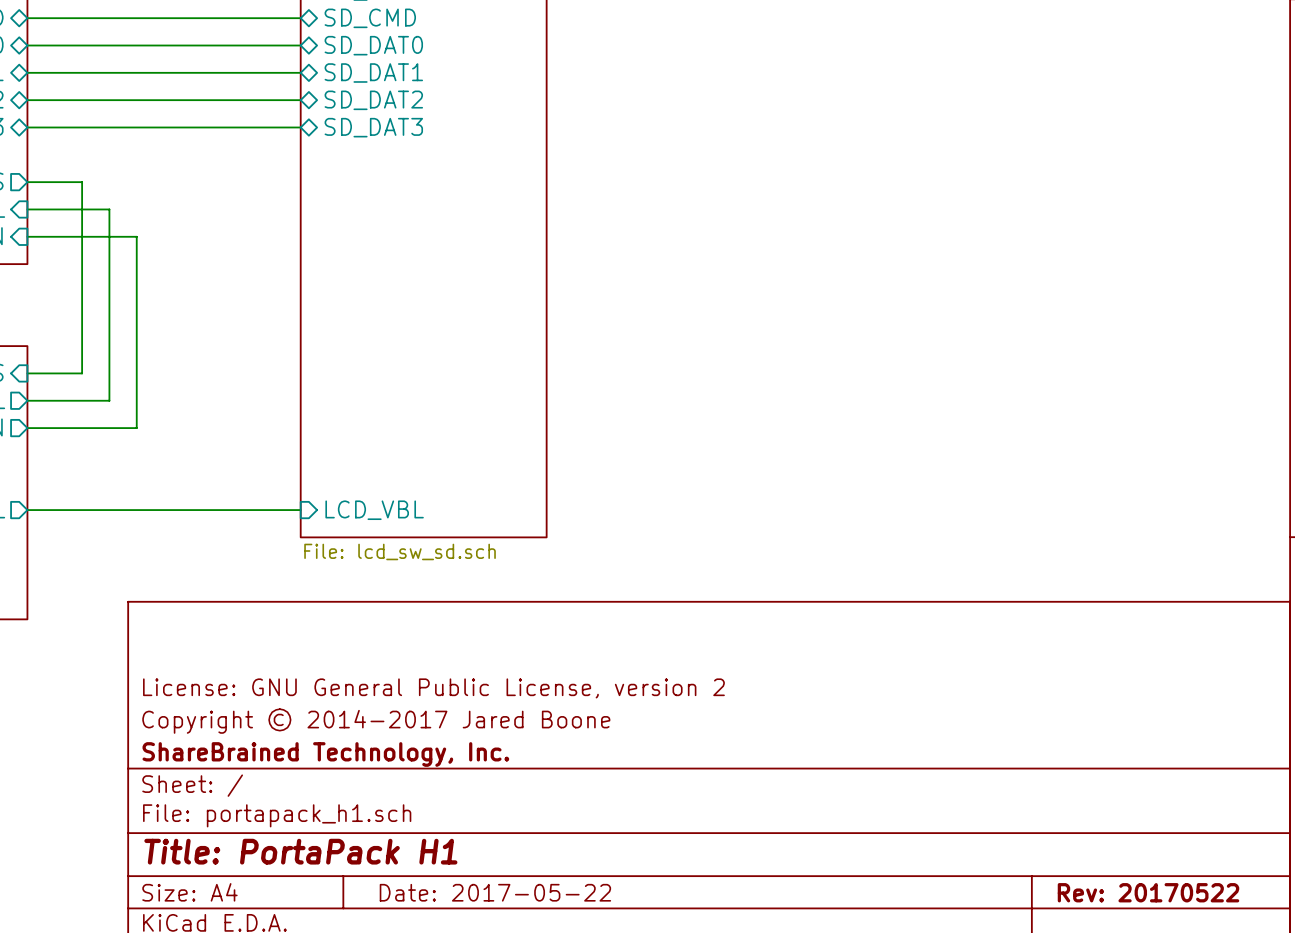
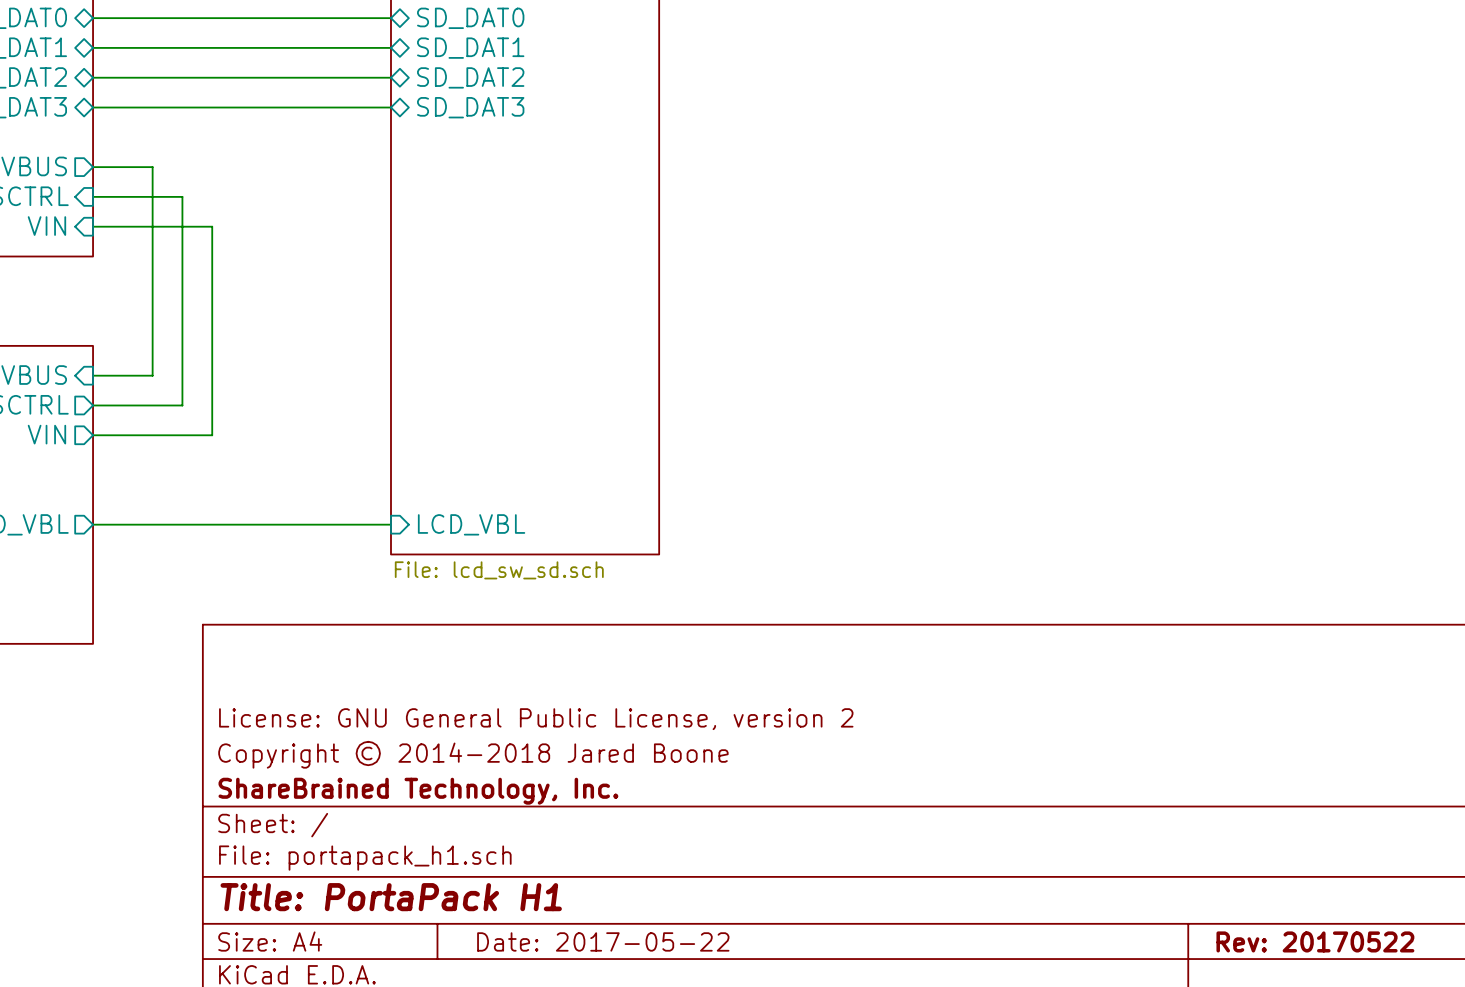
title block: Copyright © 2014-2017 Jared Boone (376, 721) -> Copyright © 2014-2018 Jared Boone (473, 754)

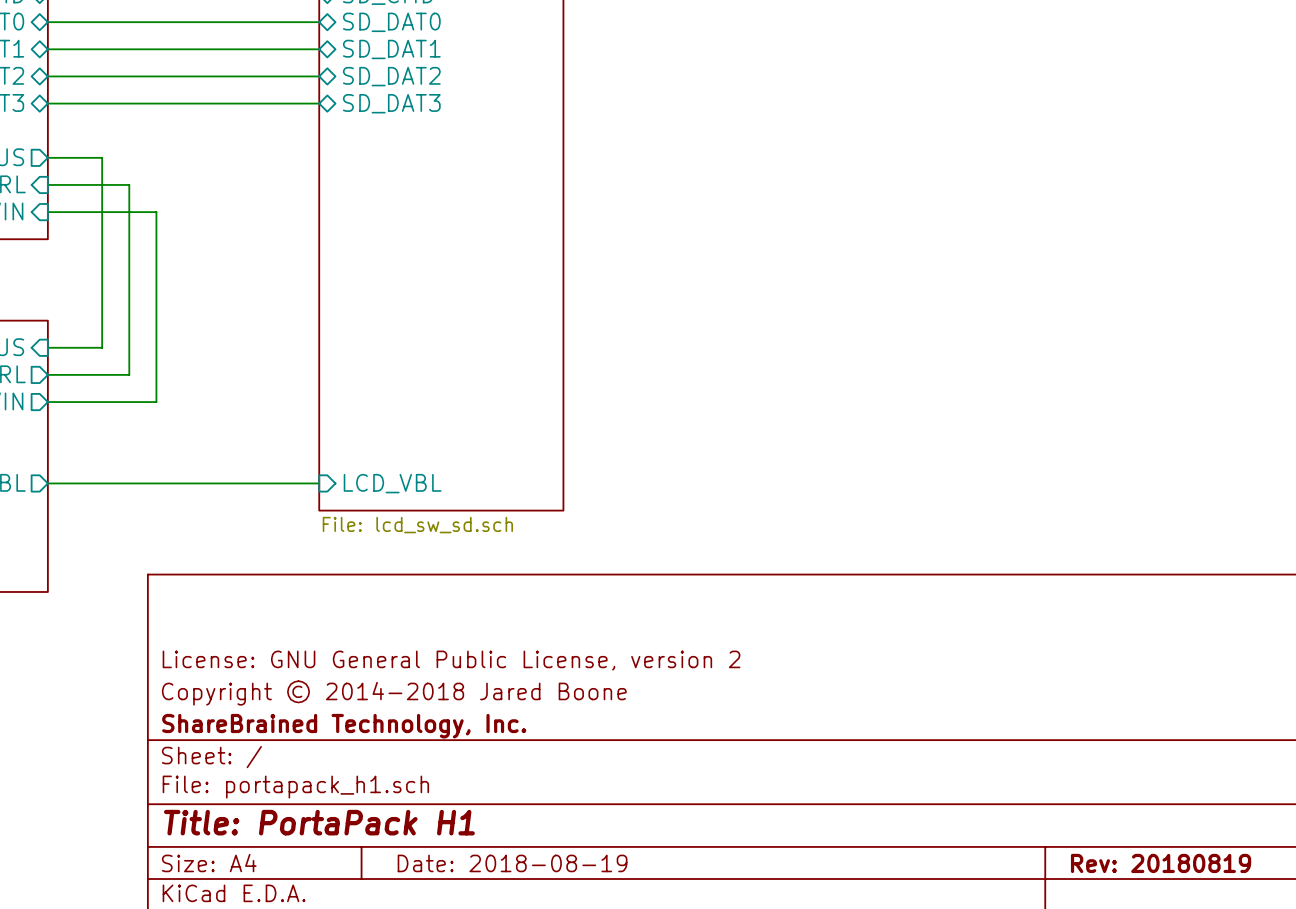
title block: Date: 2017-05-22 (603, 941) -> Date: 2018-08-19 (512, 863)
title block: Rev: 20170522 (1315, 941) -> Rev: 20180819 (1161, 863)

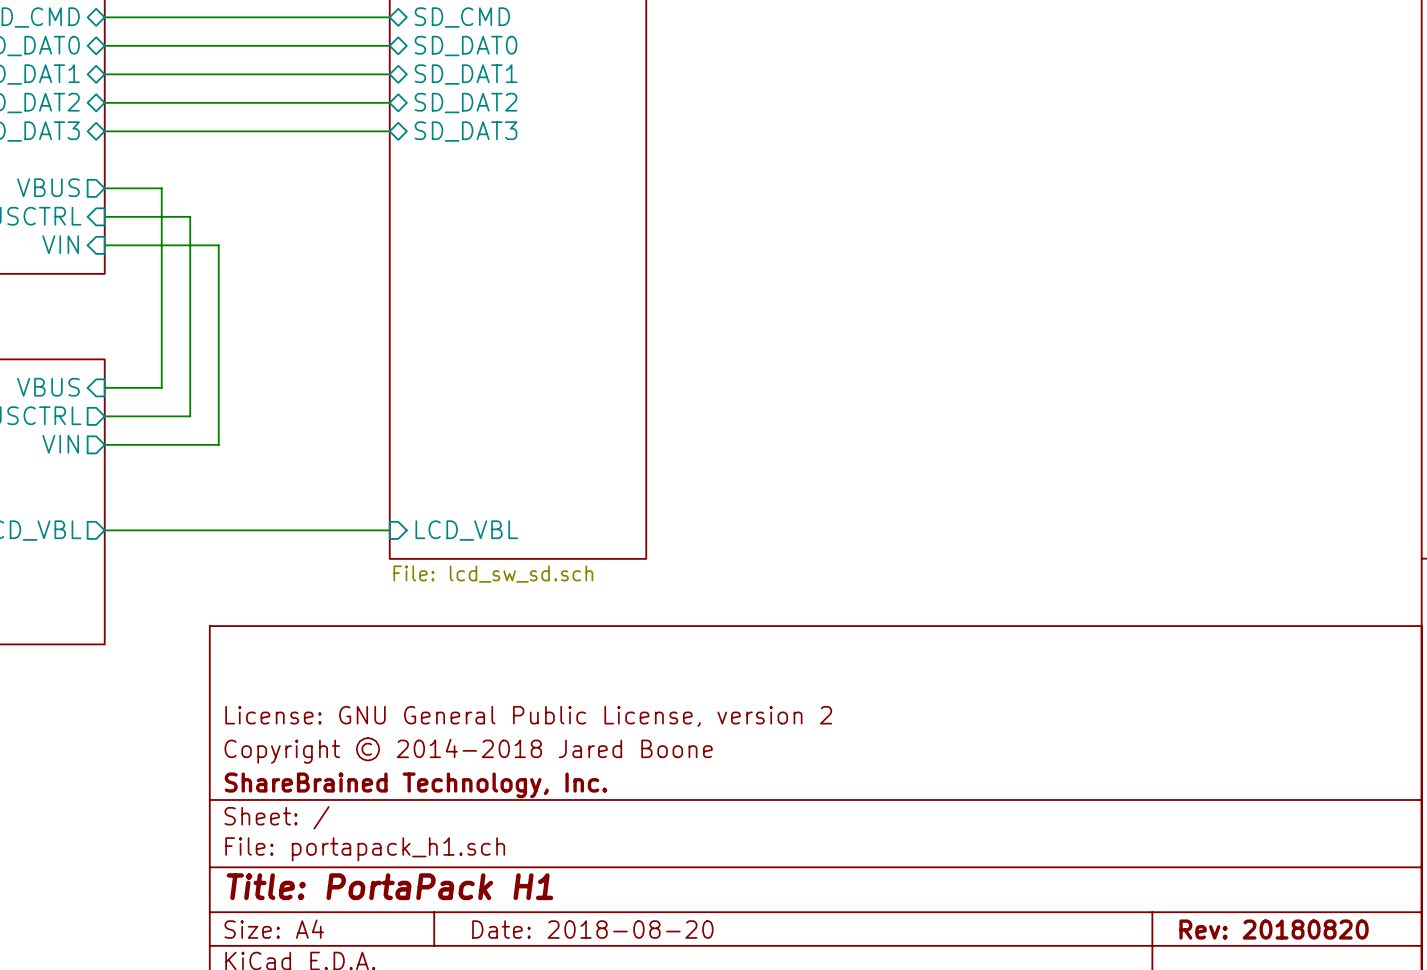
title block: Date: 2018-08-19 (512, 863) -> Date: 2018-08-20 (592, 929)
title block: Rev: 20180819 (1161, 863) -> Rev: 20180820 (1274, 929)

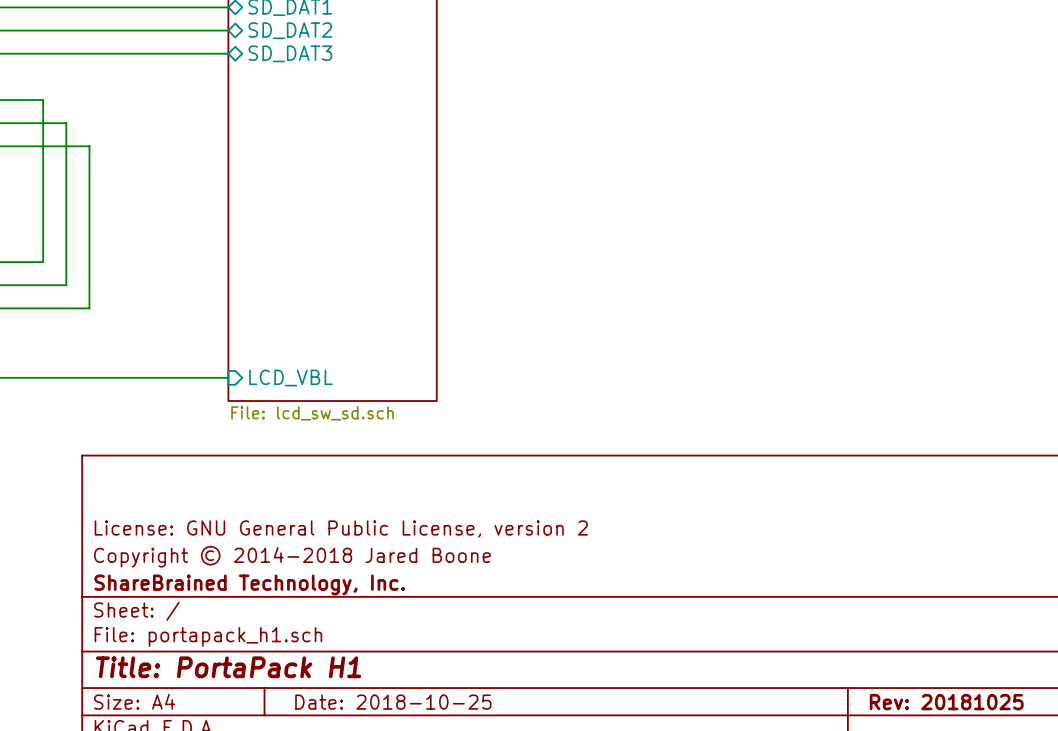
title block: Date: 2018-08-20 (592, 929) -> Date: 2018-10-25 (393, 702)
title block: Rev: 20180820 (1274, 929) -> Rev: 20181025 (946, 702)

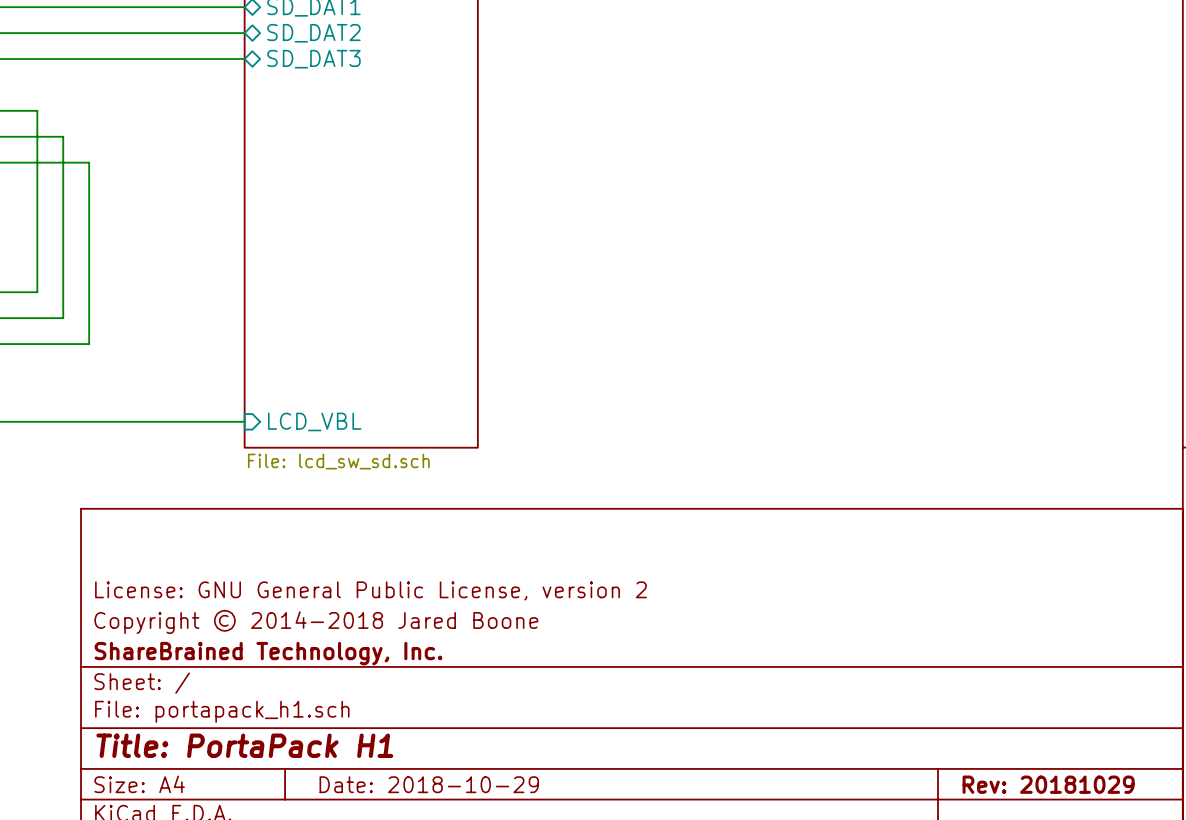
title block: Date: 2018-10-25 (393, 702) -> Date: 2018-10-29 (429, 784)
title block: Rev: 20181025 (946, 702) -> Rev: 20181029 (1048, 784)

